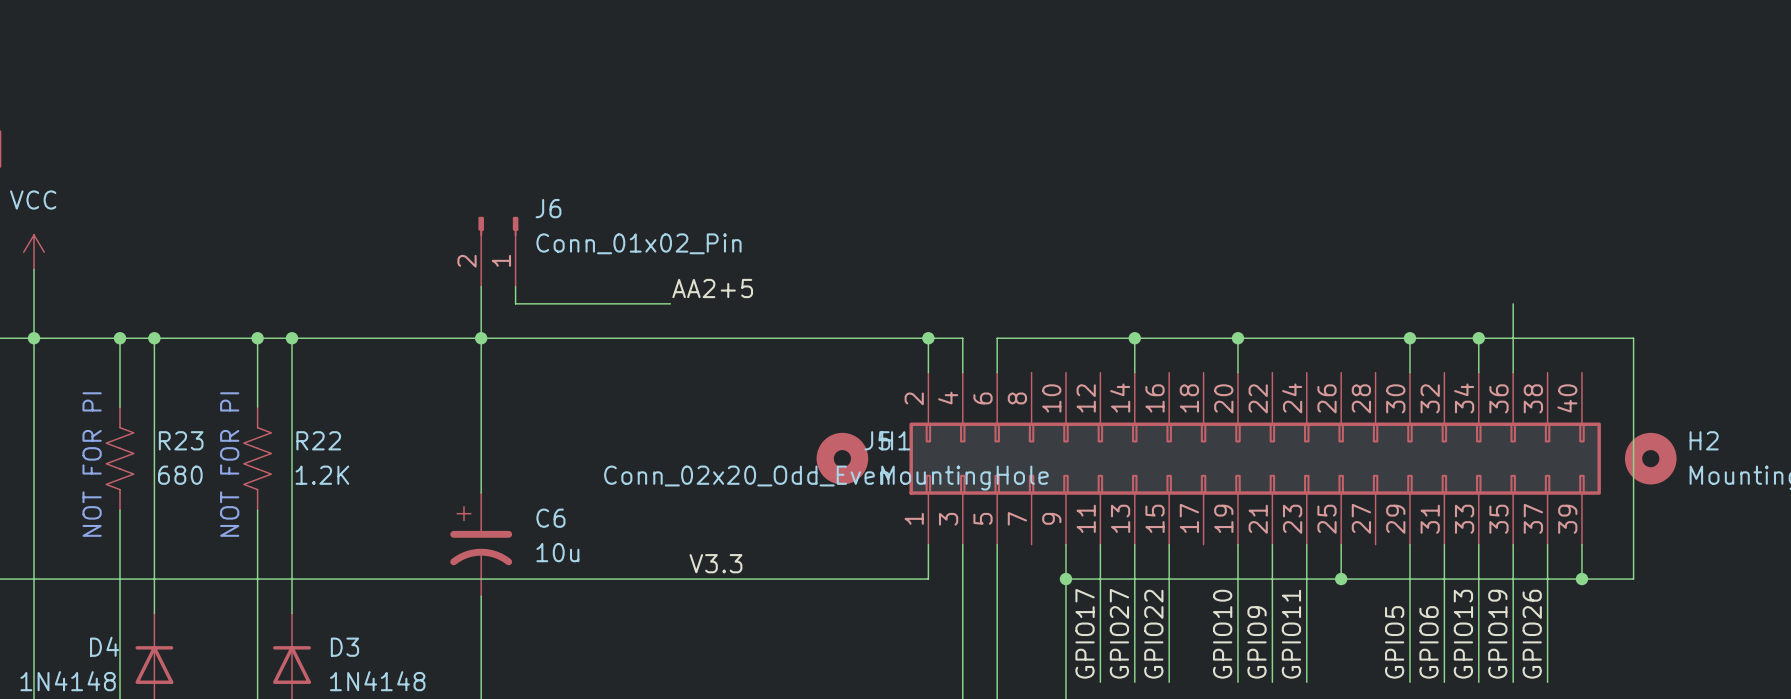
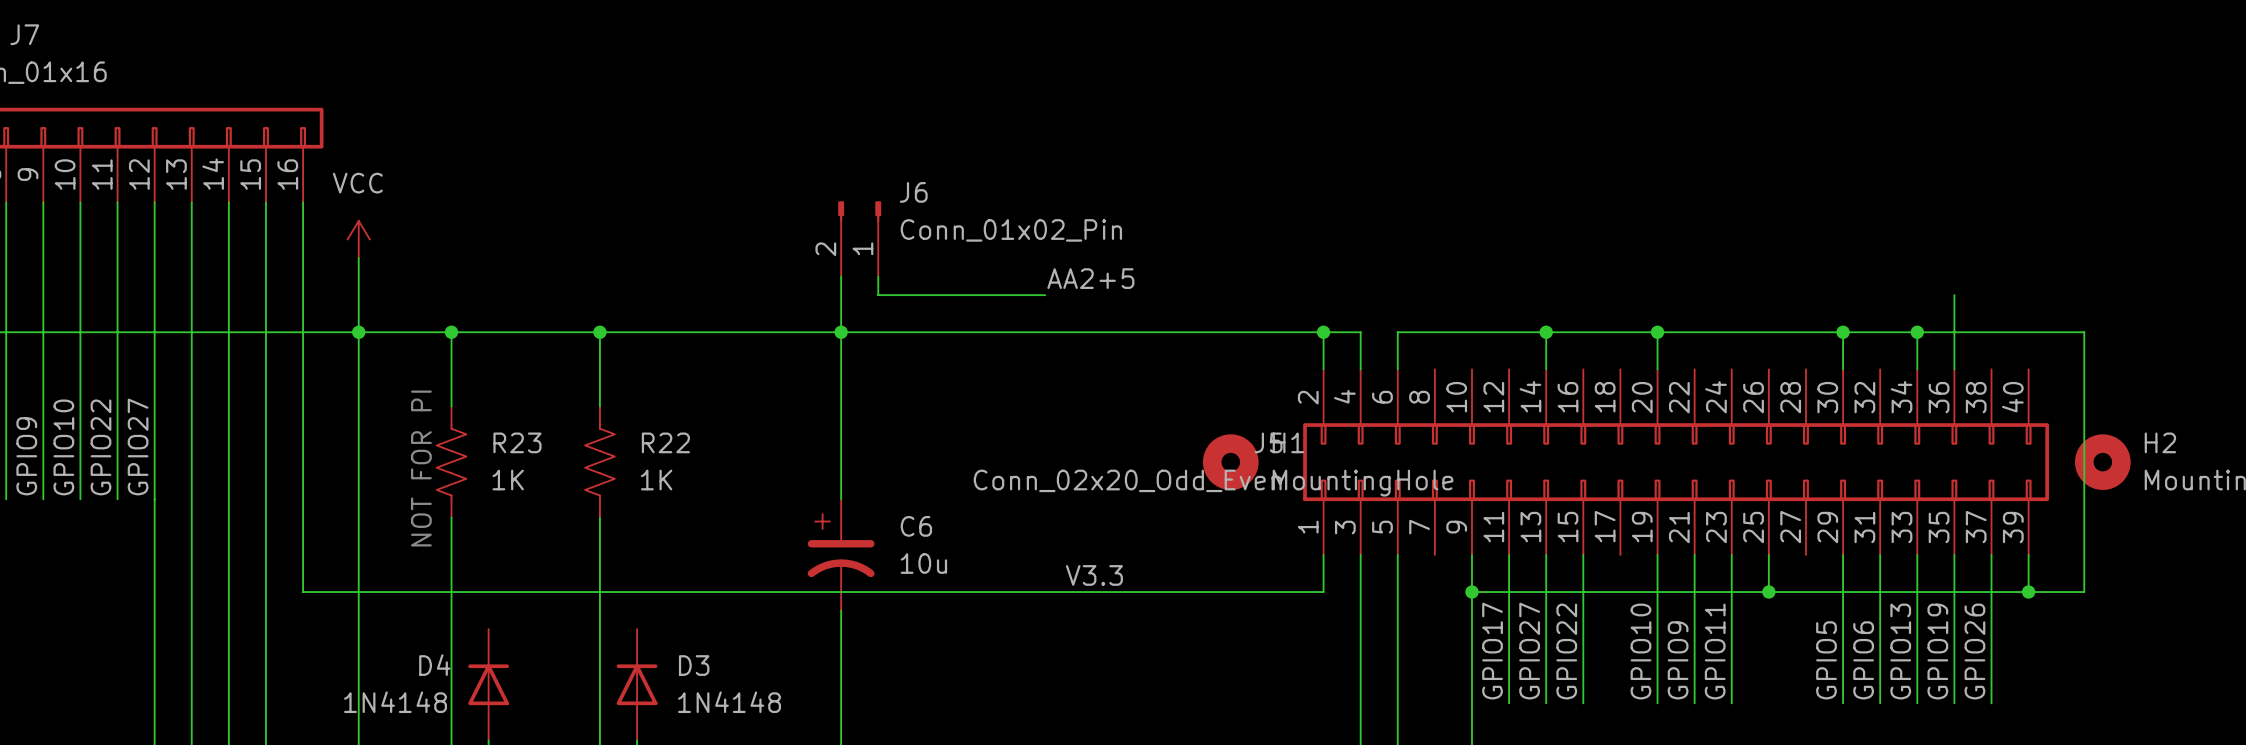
wire: (154, 338) (154, 613) -> none
junction: (154, 338) -> none
wire: (291, 338) (291, 613) -> none
junction: (291, 338) -> none
text: NOT FOR PI (229, 464) -> none
R23 value: 680 (180, 475) -> 1K (508, 480)
R22 value: 1.2K (322, 475) -> 1K (656, 480)

